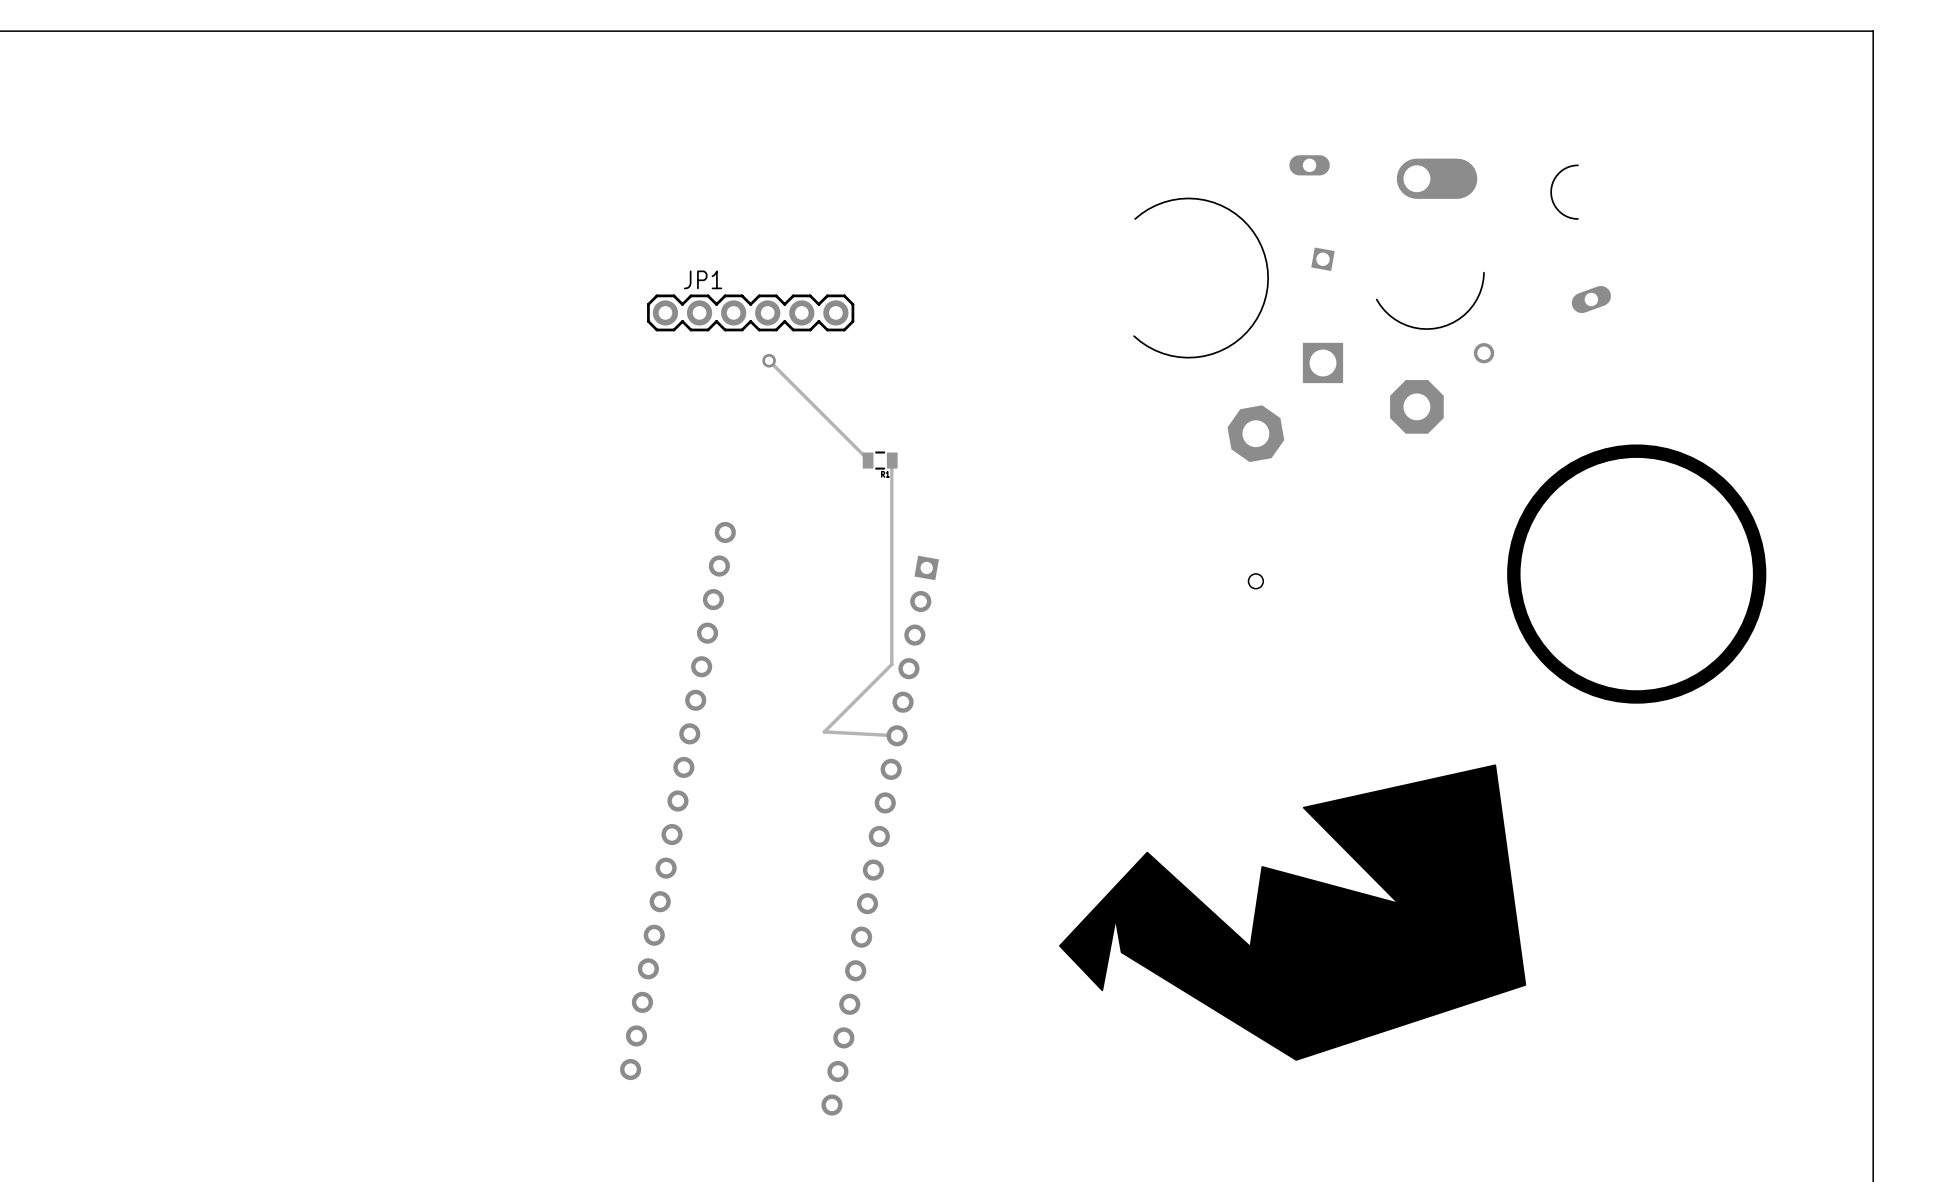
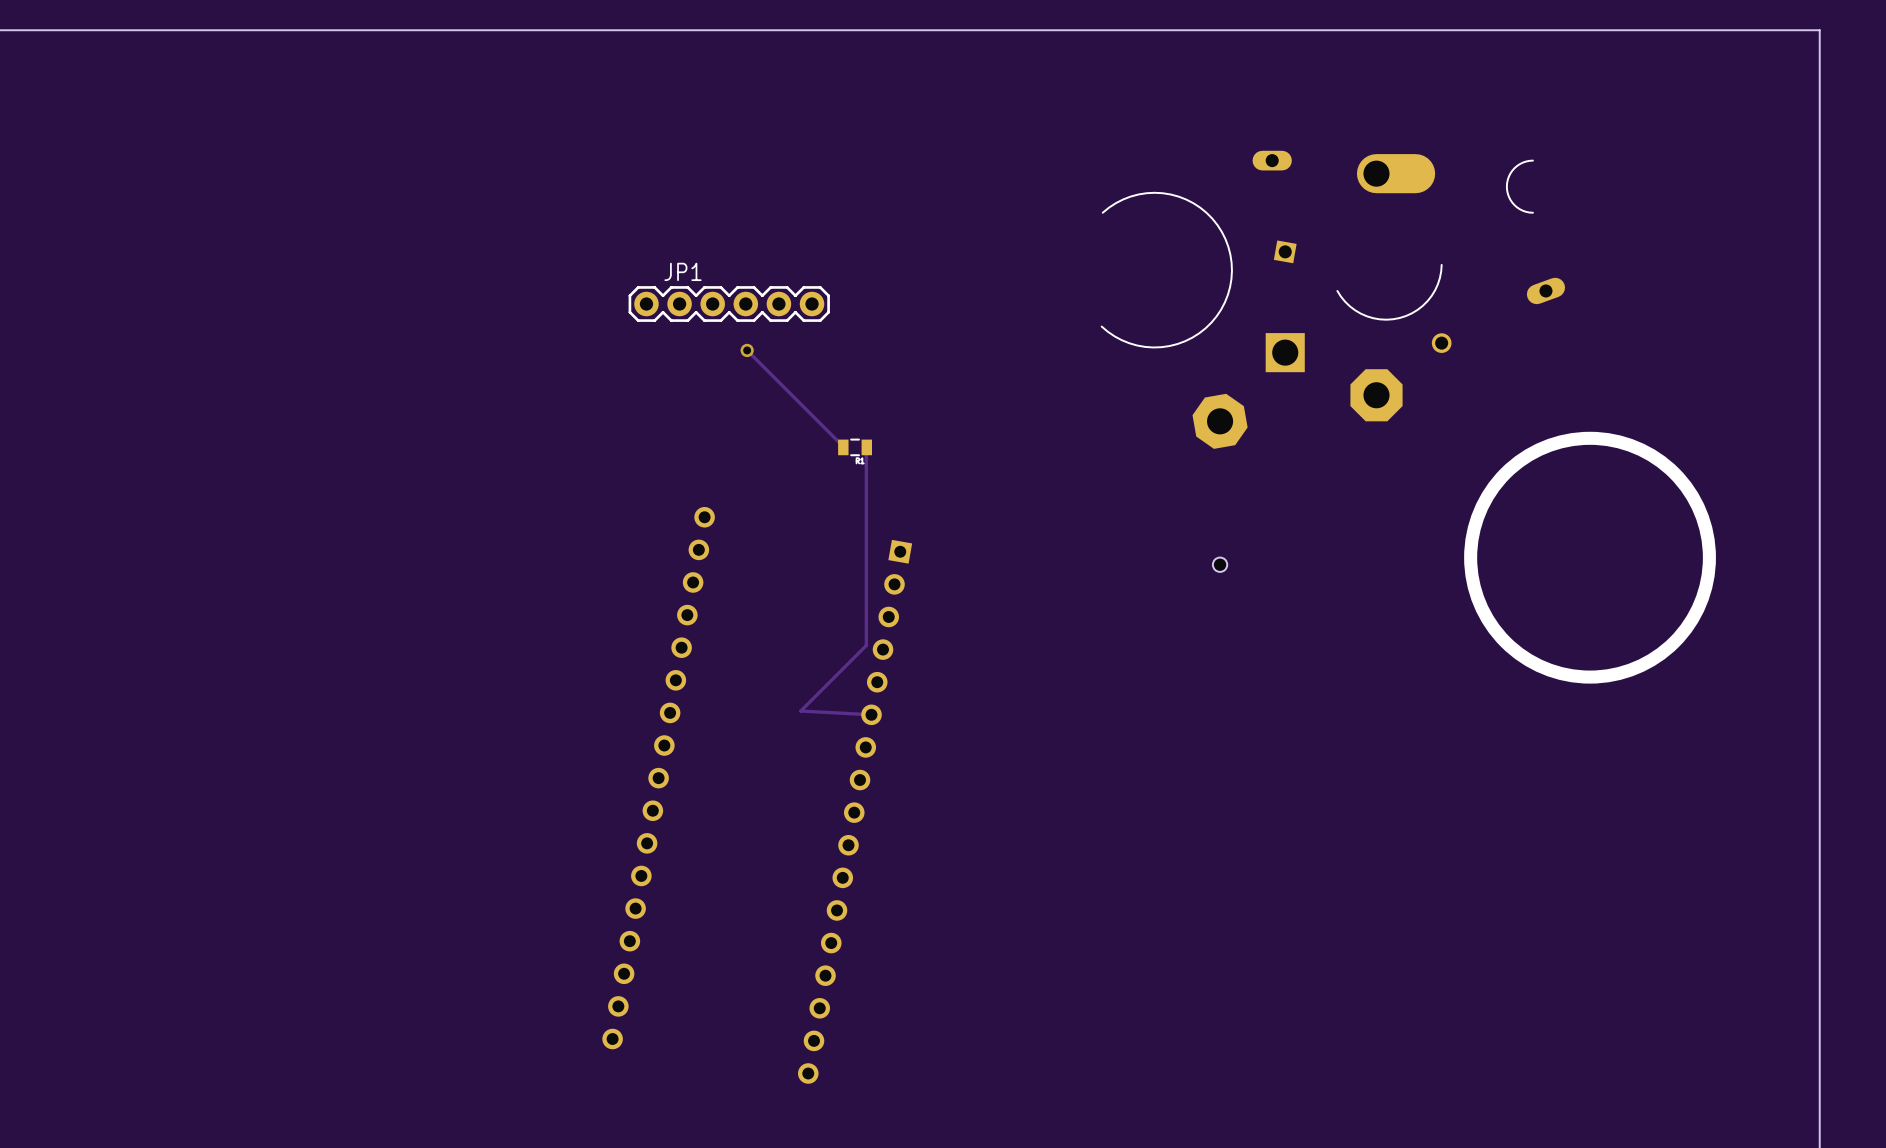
drawing: [1059, 764, 1527, 1061] -> none

